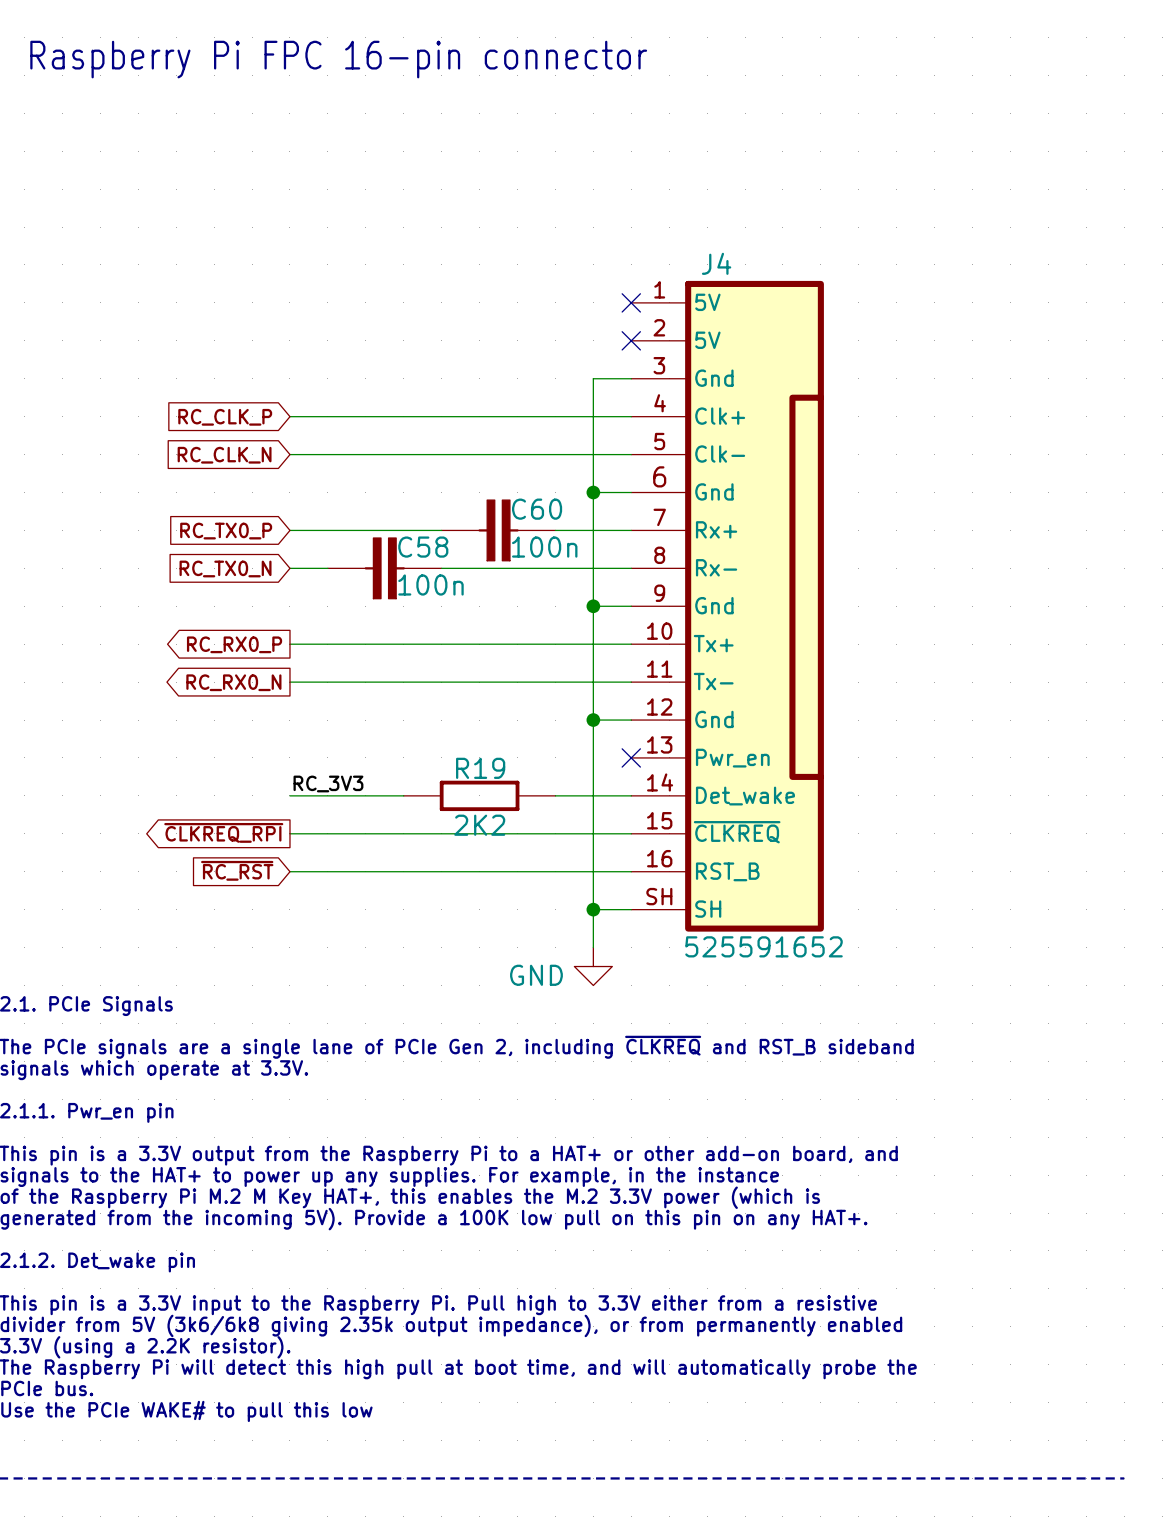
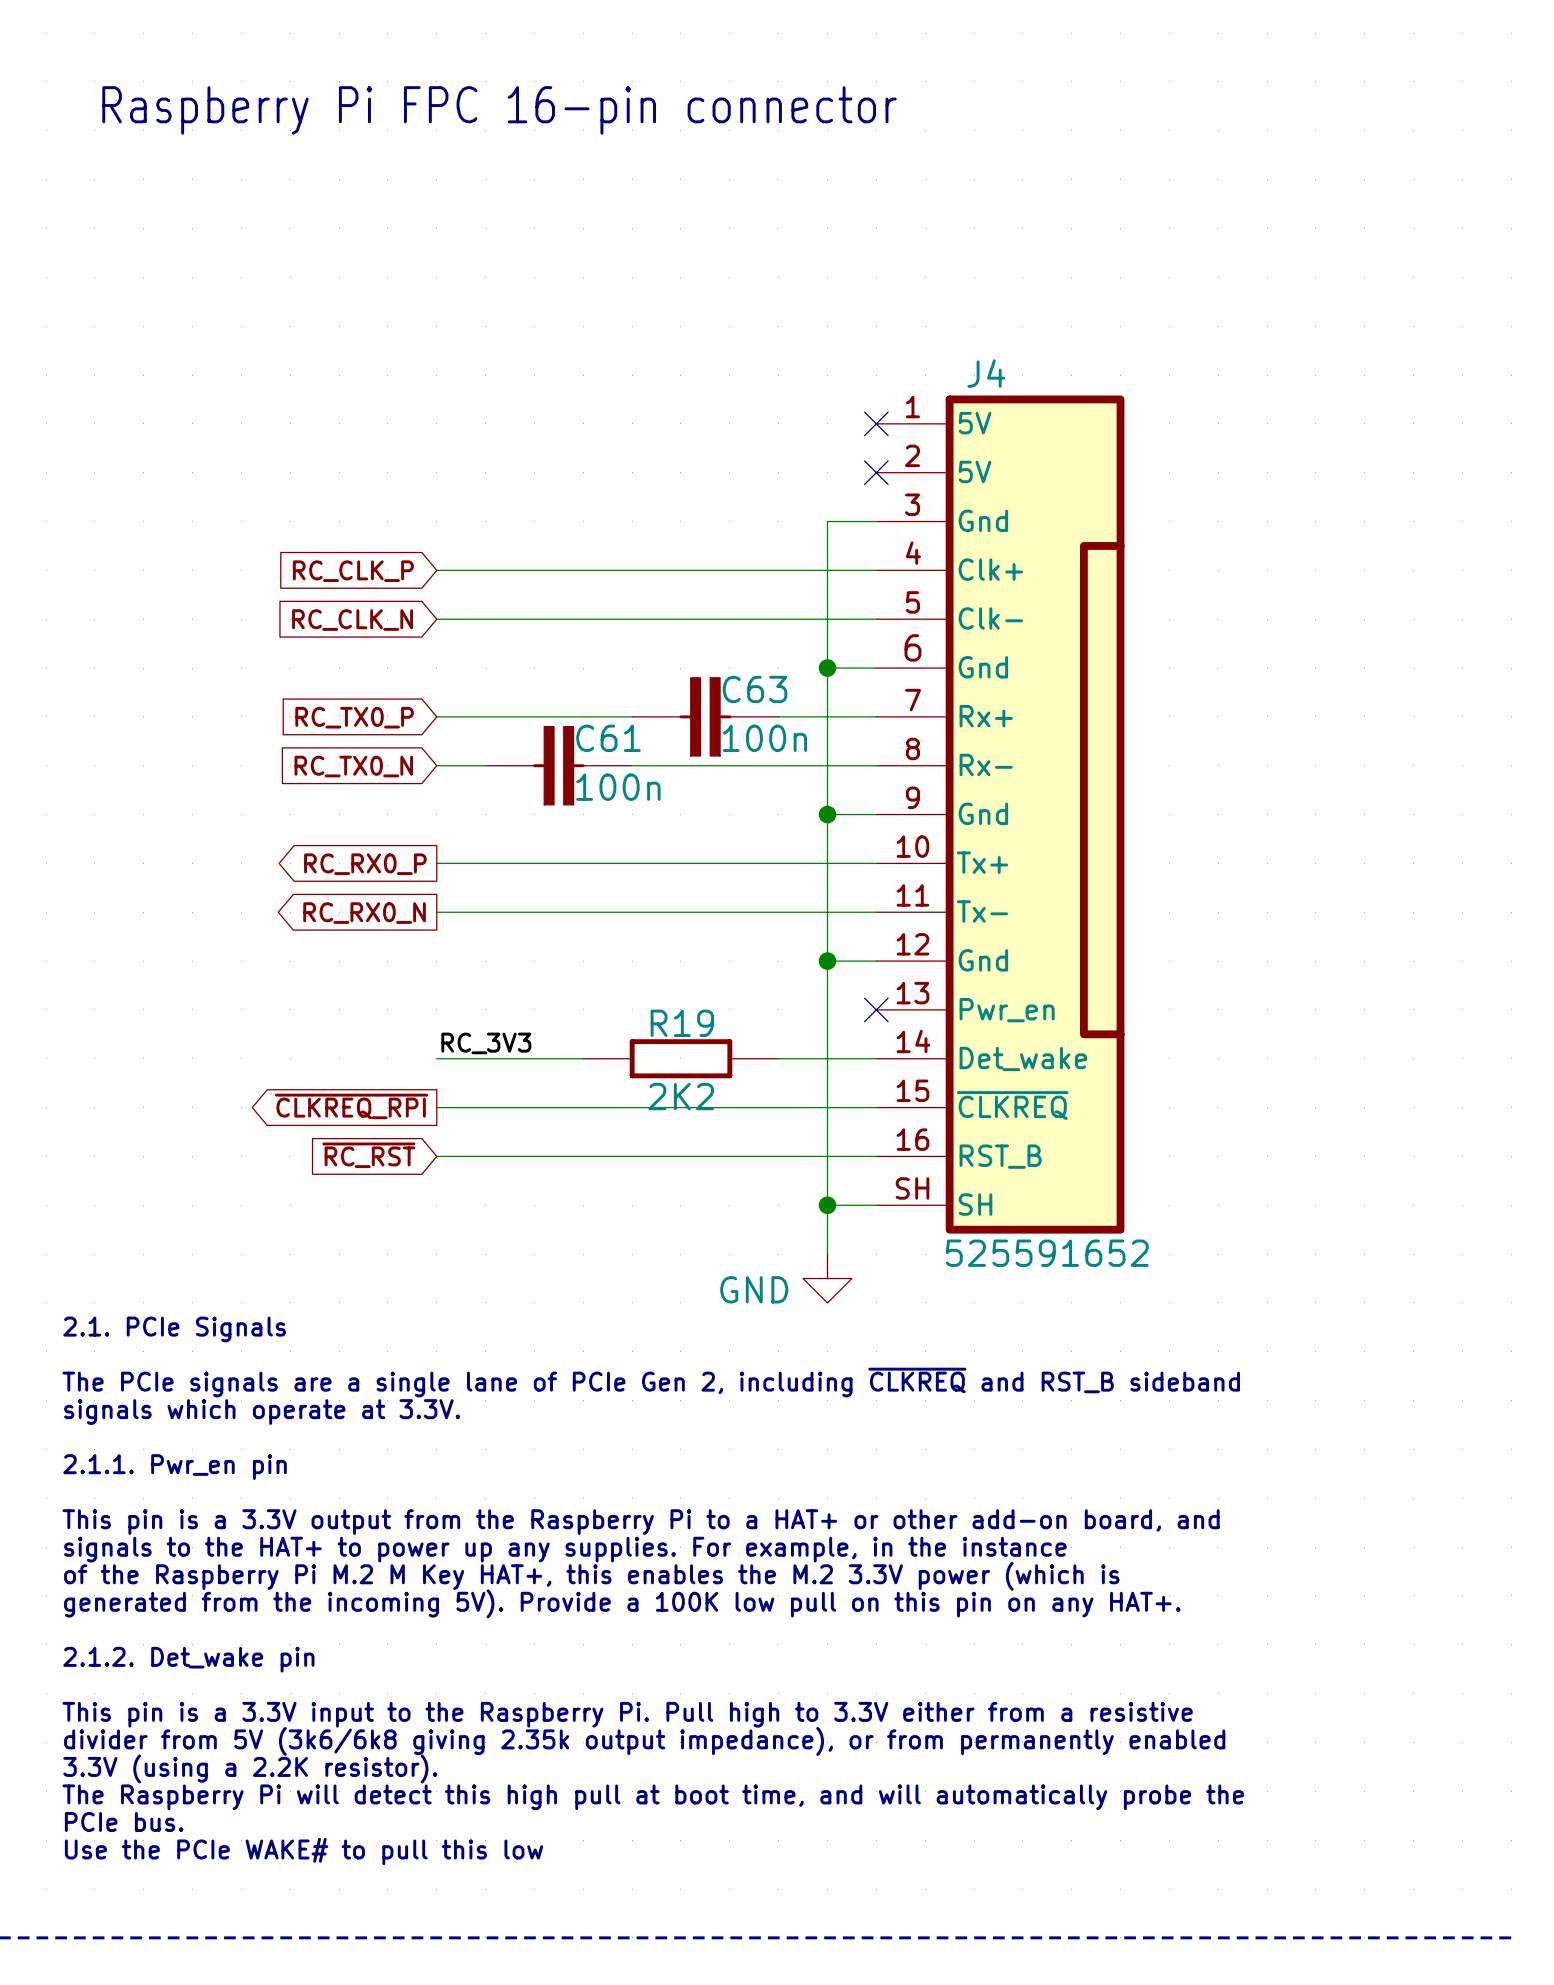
C60 name: C60 (537, 509) -> C63 (755, 689)
C58 name: C58 (423, 547) -> C61 (608, 738)

